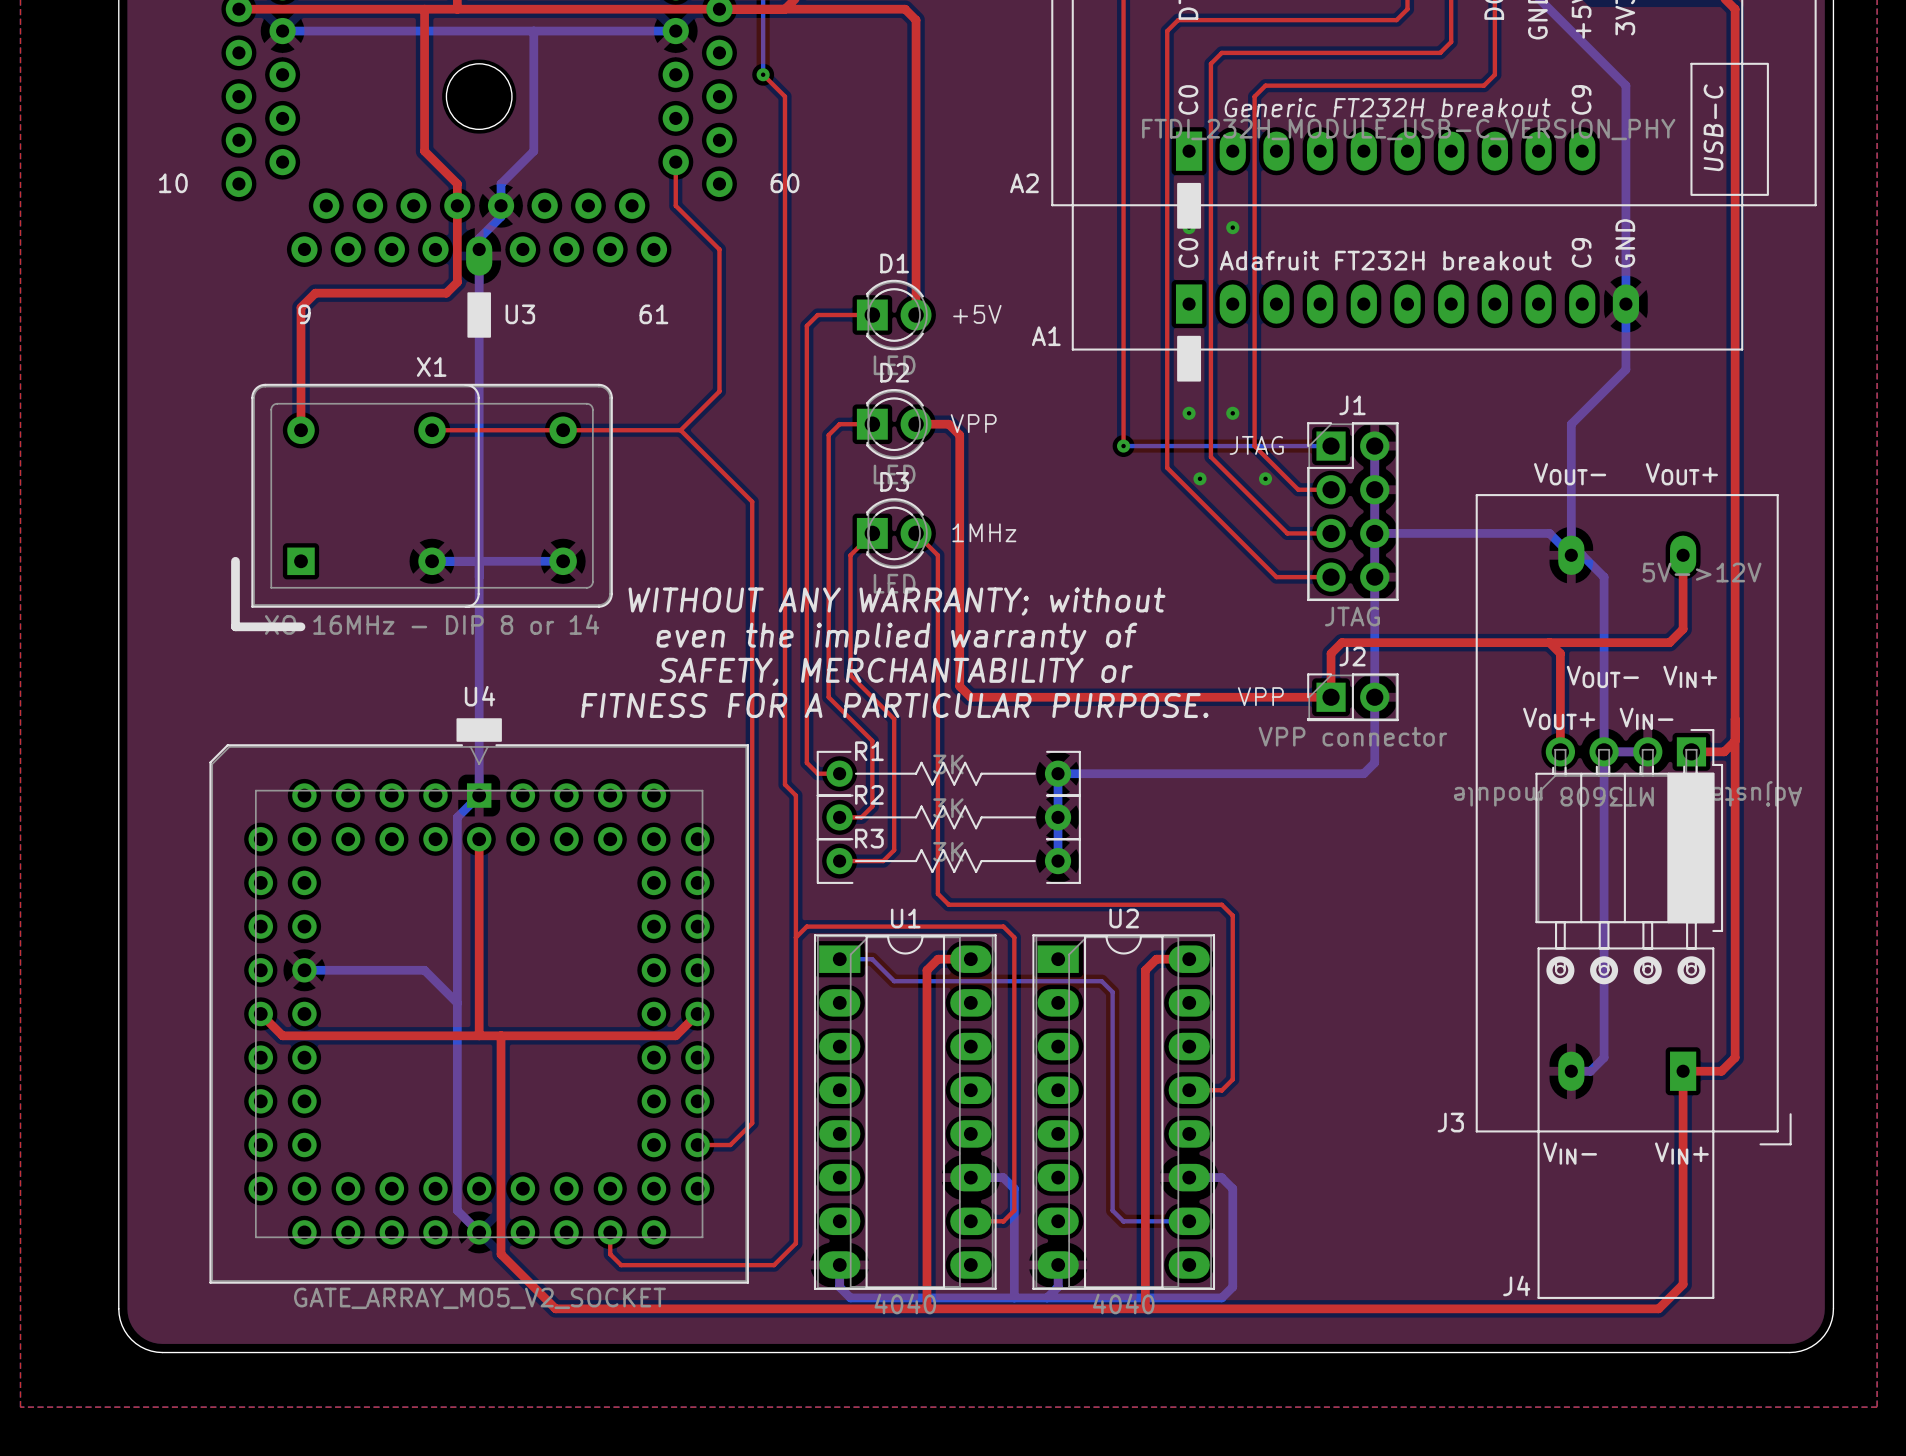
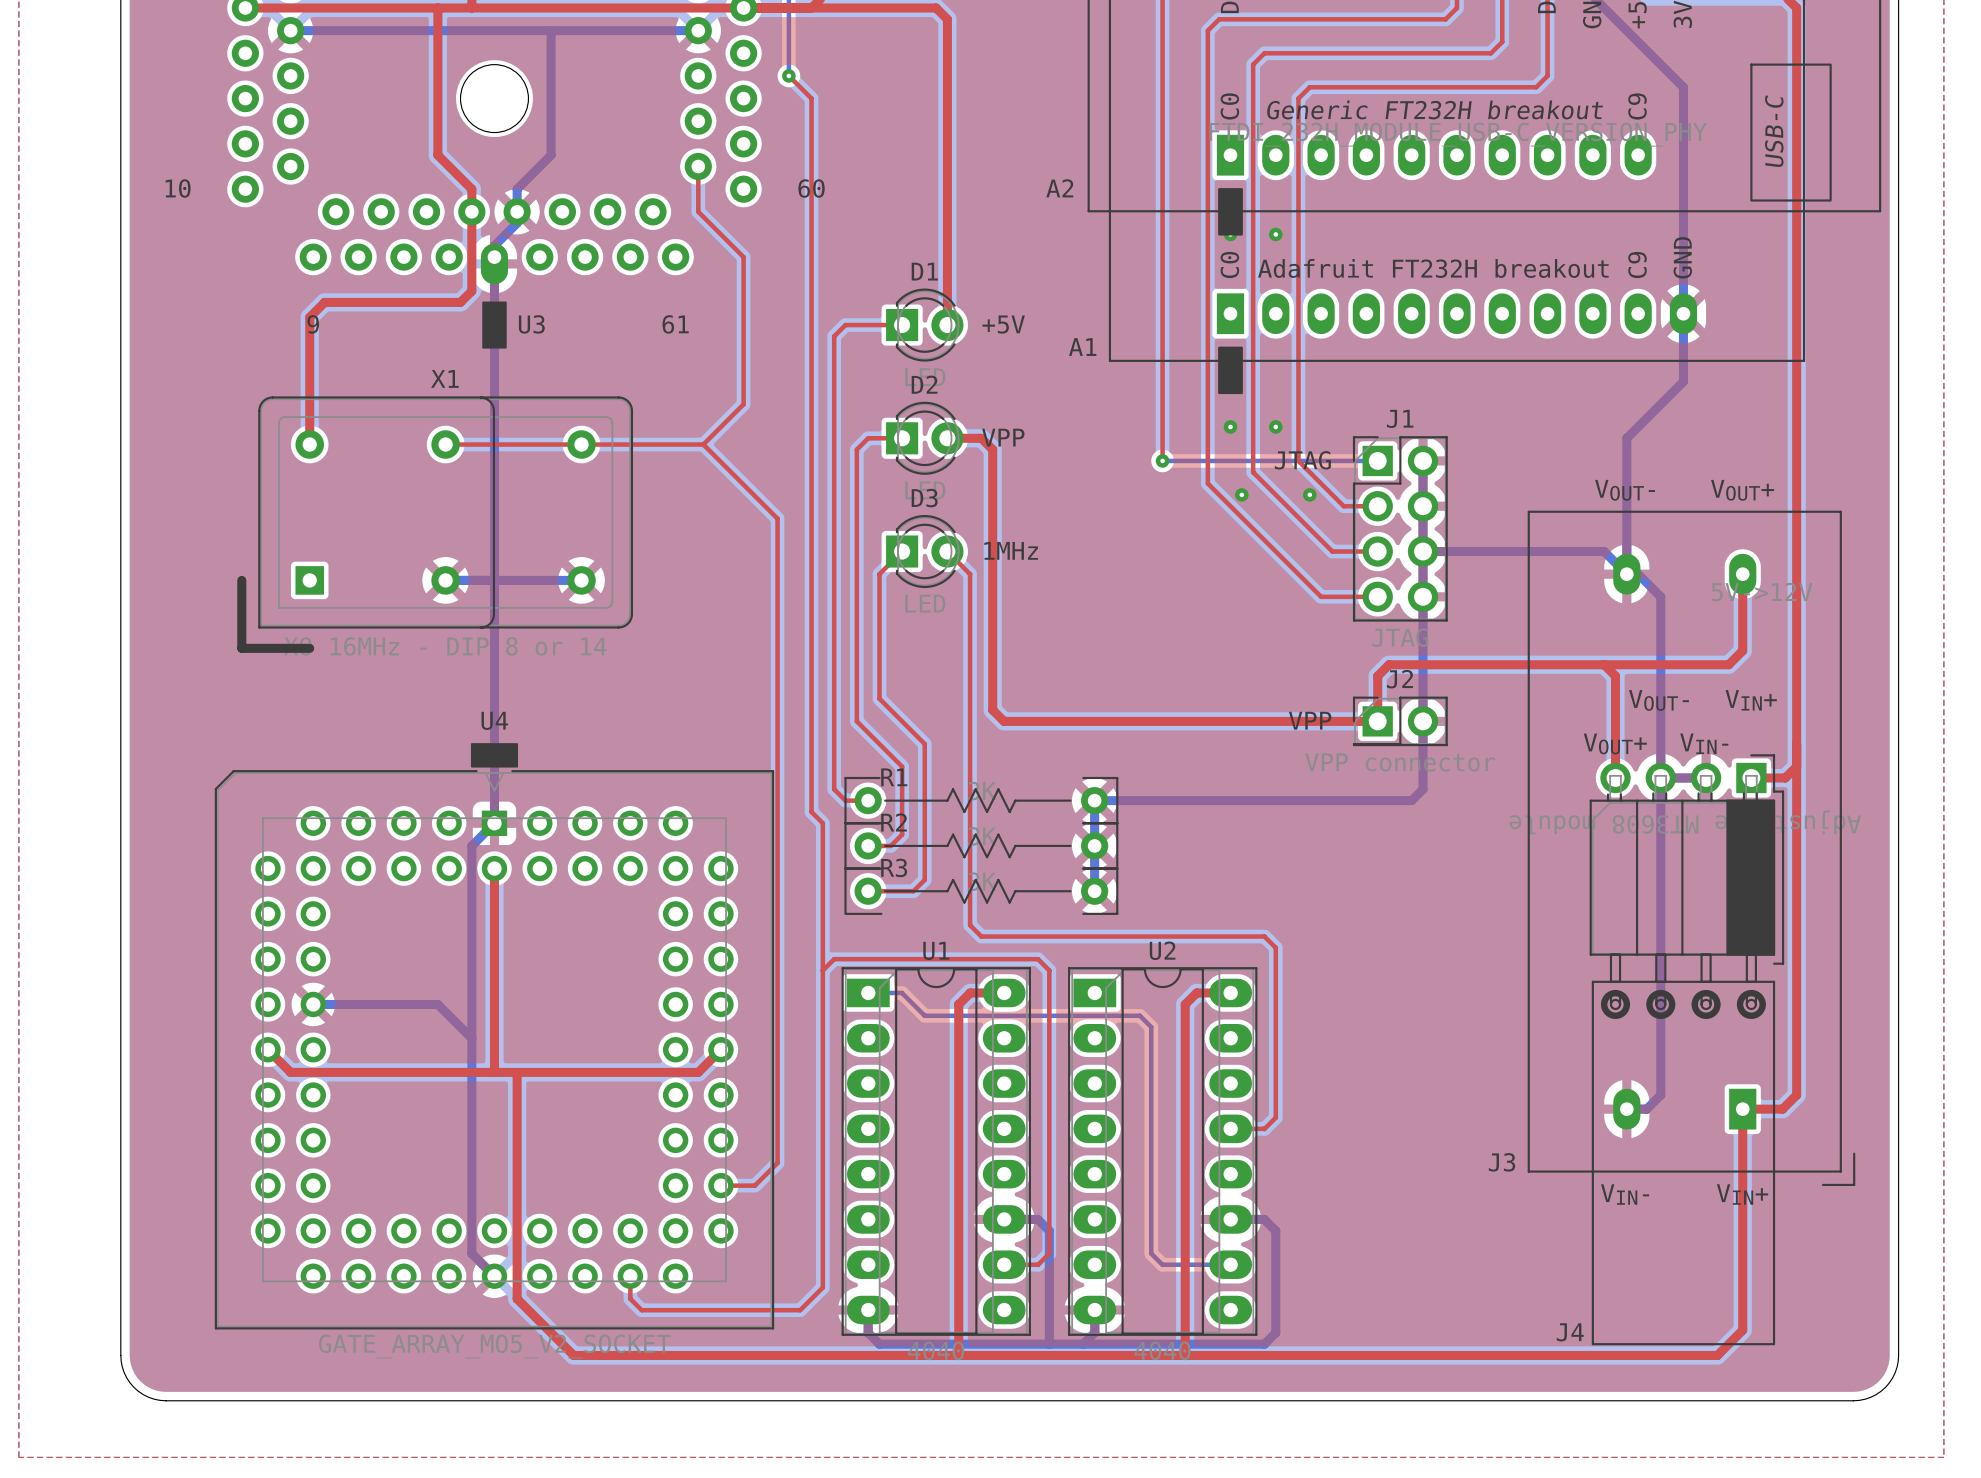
text: WITHOUT ANY WARRANTY; without (896, 601) -> none
text: even the implied warranty of (896, 638) -> none
text: SAFETY, MERCHANTABILITY or (896, 671) -> none
text: FITNESS FOR A PARTICULAR PURPOSE. (894, 705) -> none

